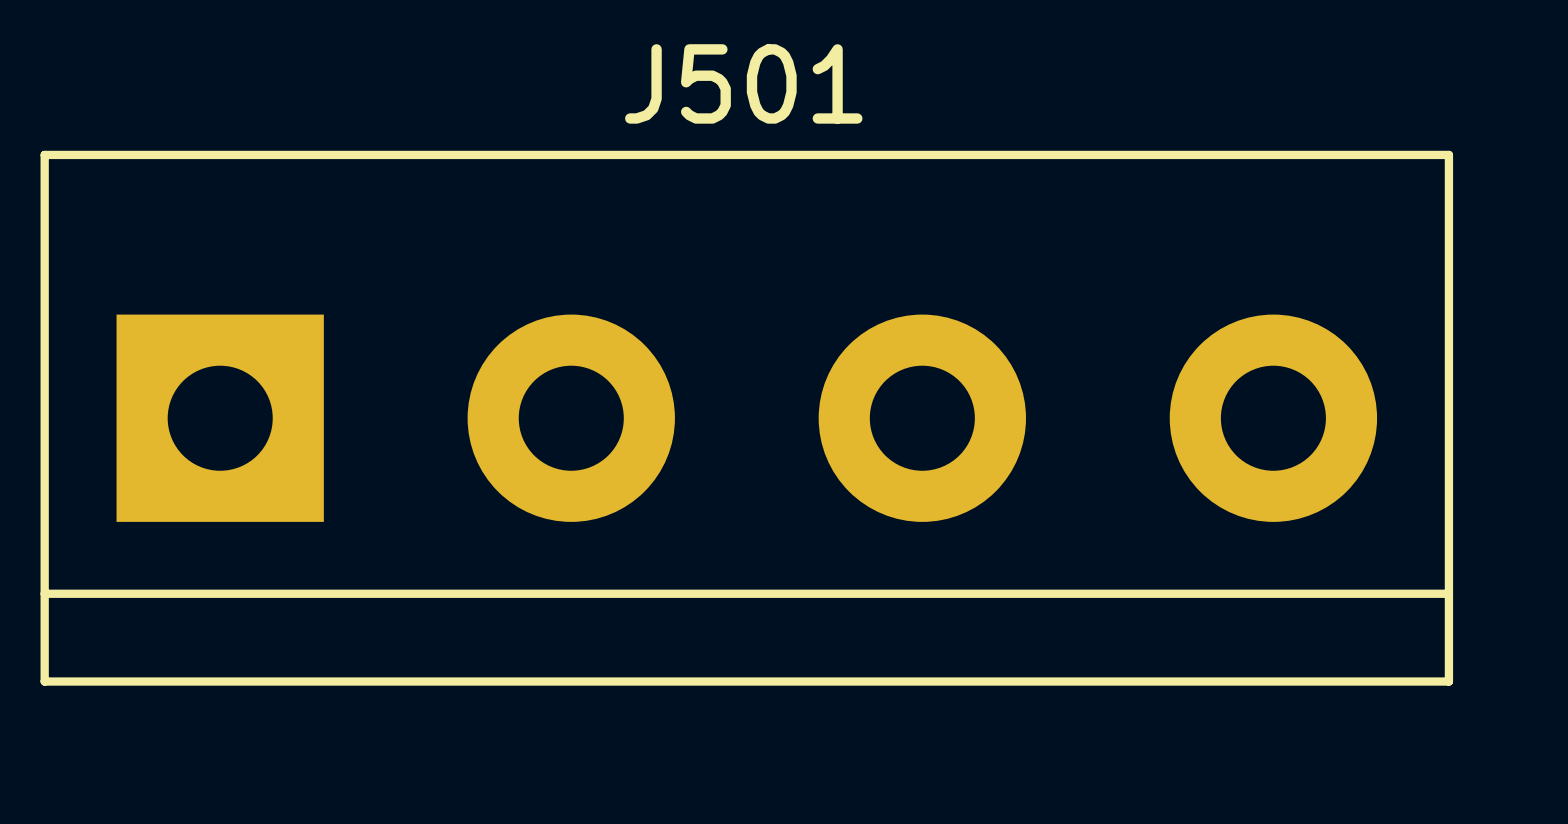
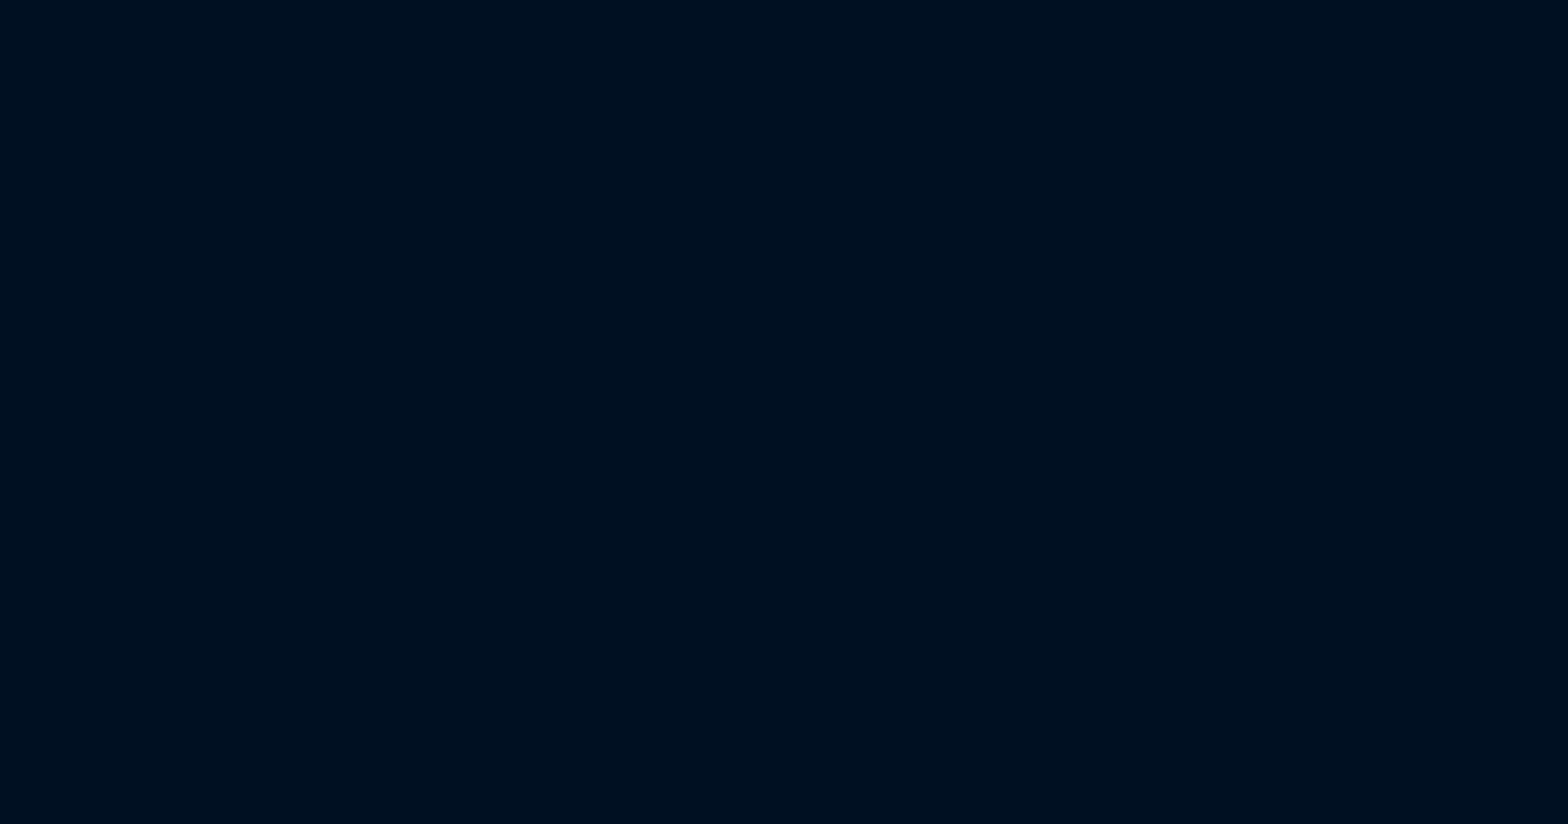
J501: (746, 418) -> none

